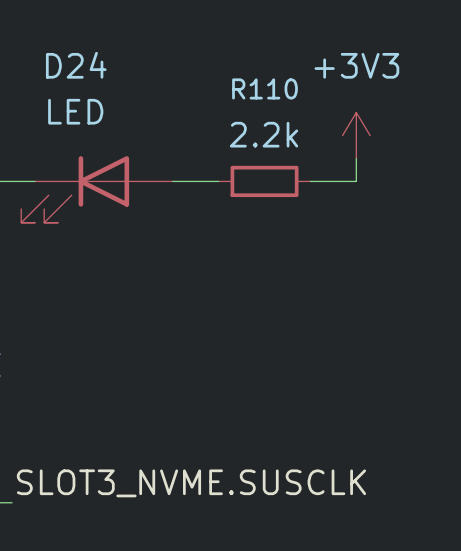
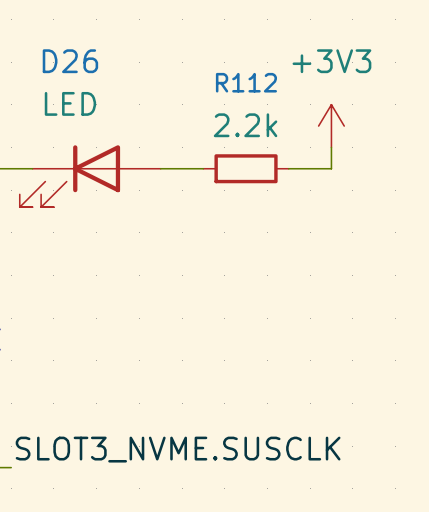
D24 name: D24 (76, 65) -> D26 (70, 61)
R110 name: R110 (264, 88) -> R112 (246, 82)

